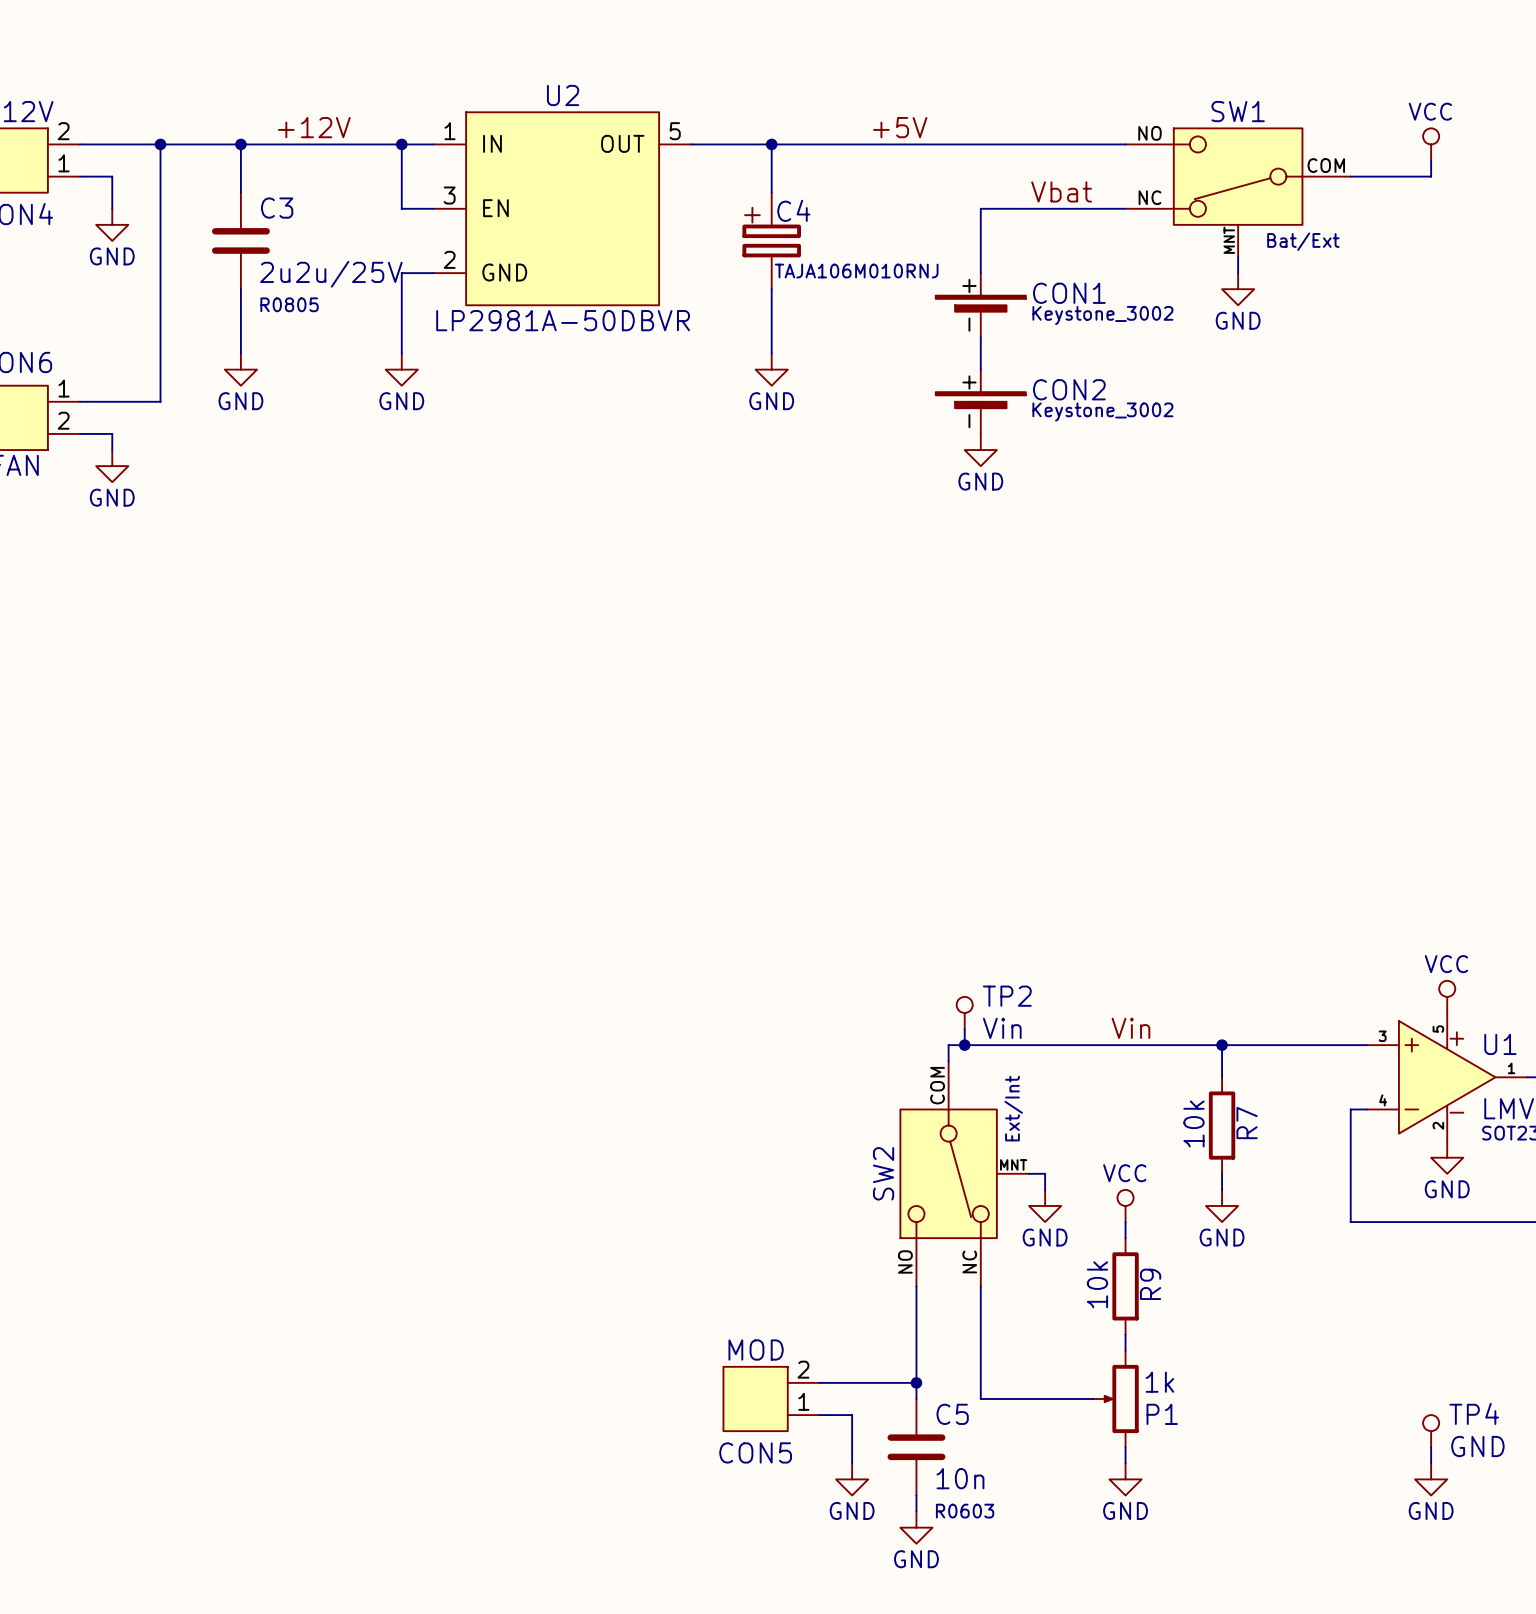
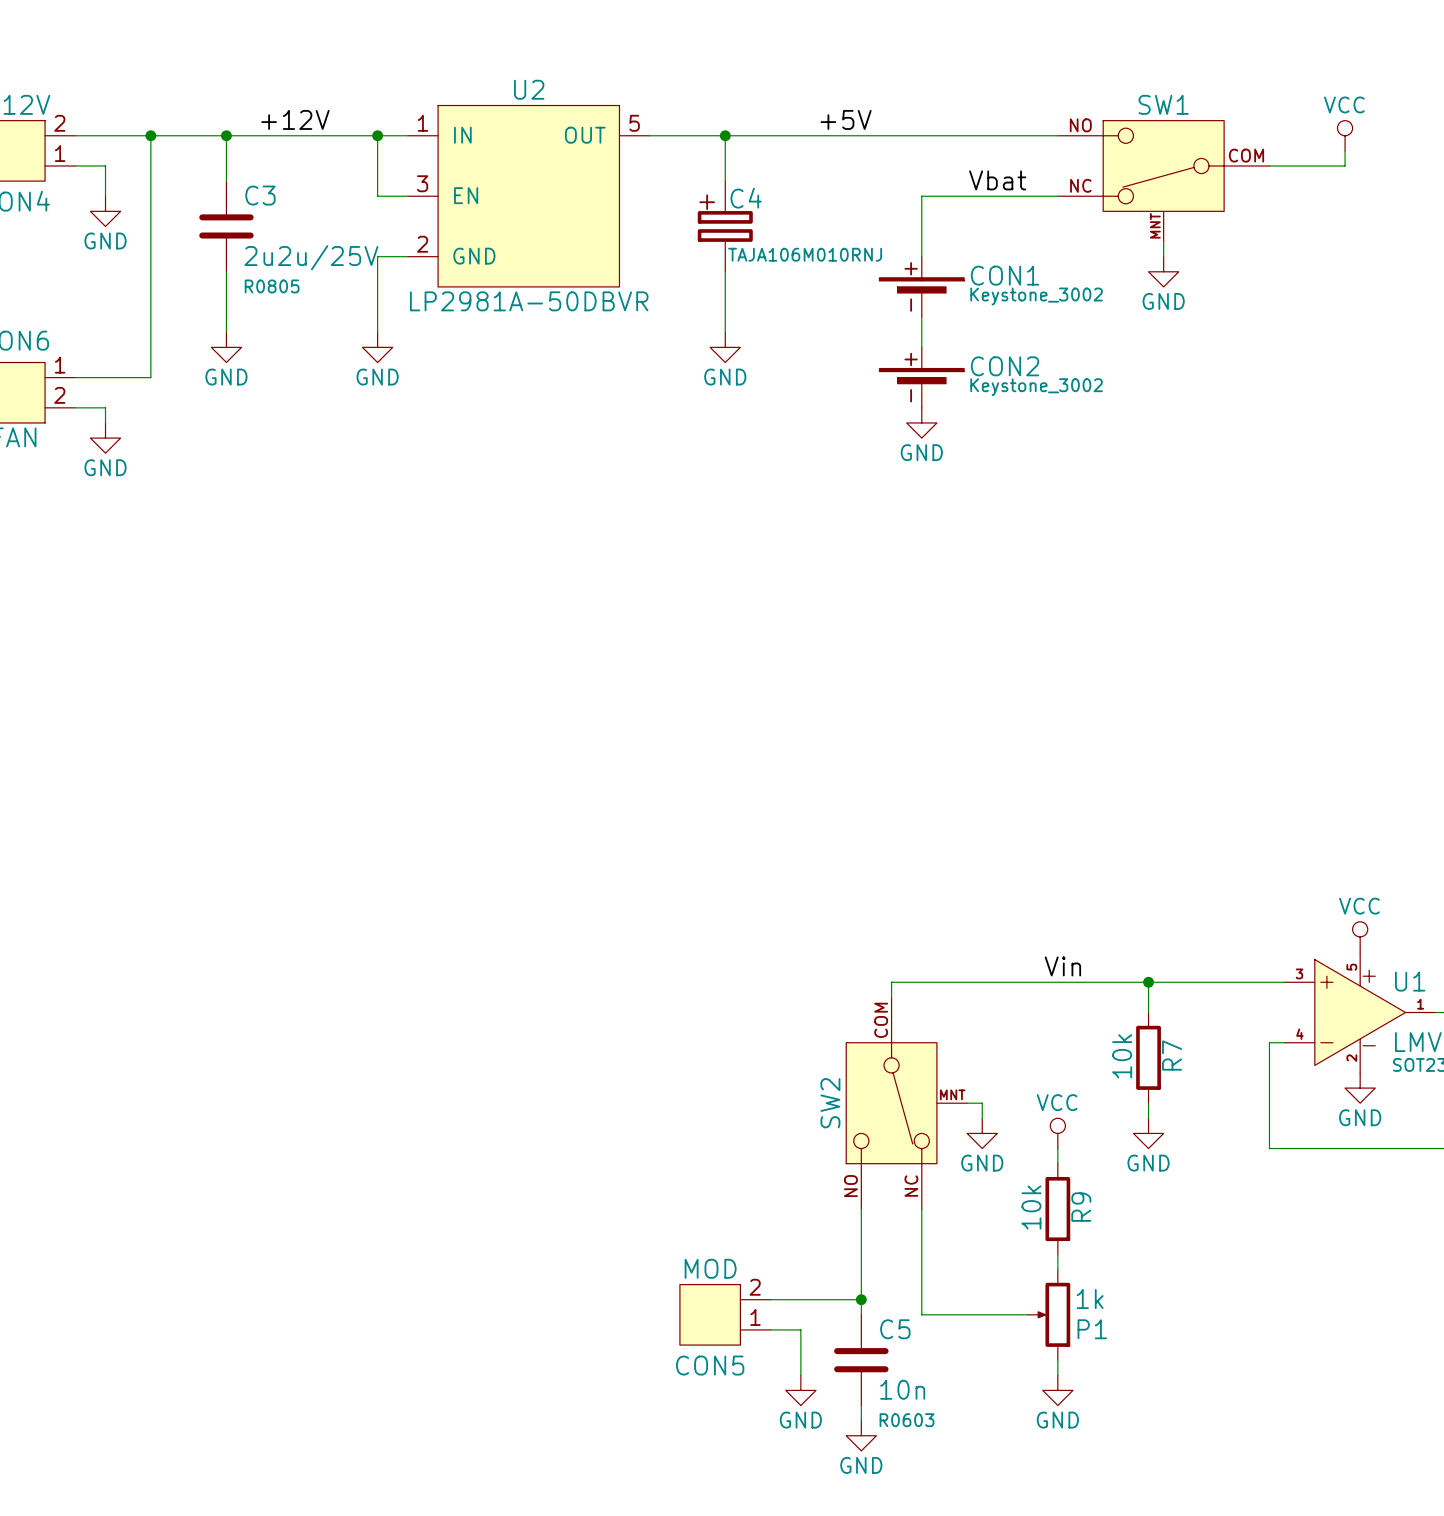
SW1 value: Bat/Ext (1303, 241) -> none
TP2: Vin (964, 1012) -> none
wire: (964, 1029) (964, 1045) -> none
junction: (964, 1045) -> none
SW2 value: Ext/Int (1013, 1108) -> none
TP4: GND (1431, 1431) -> none
wire: (1431, 1447) (1431, 1463) -> none
power symbol: GND (1431, 1479) -> none

